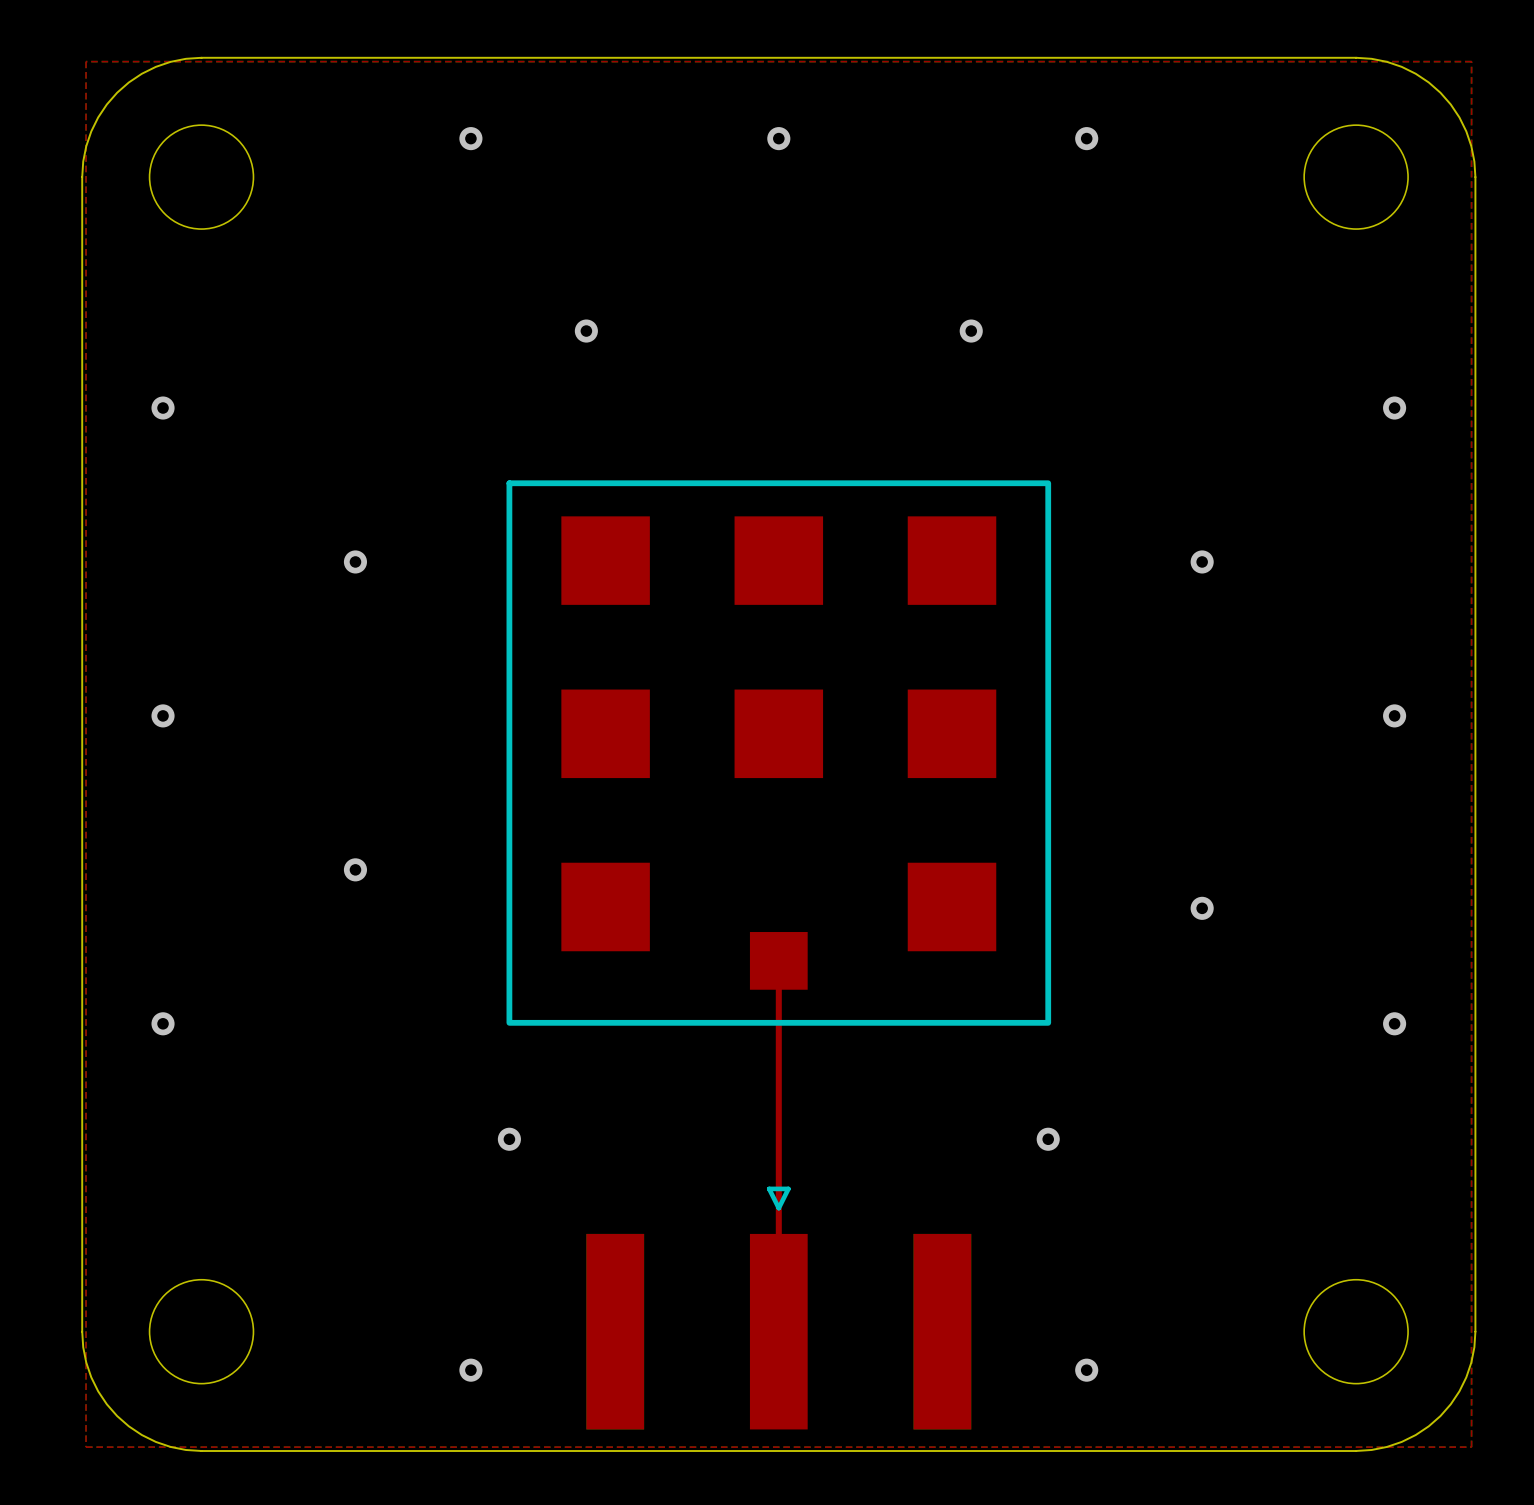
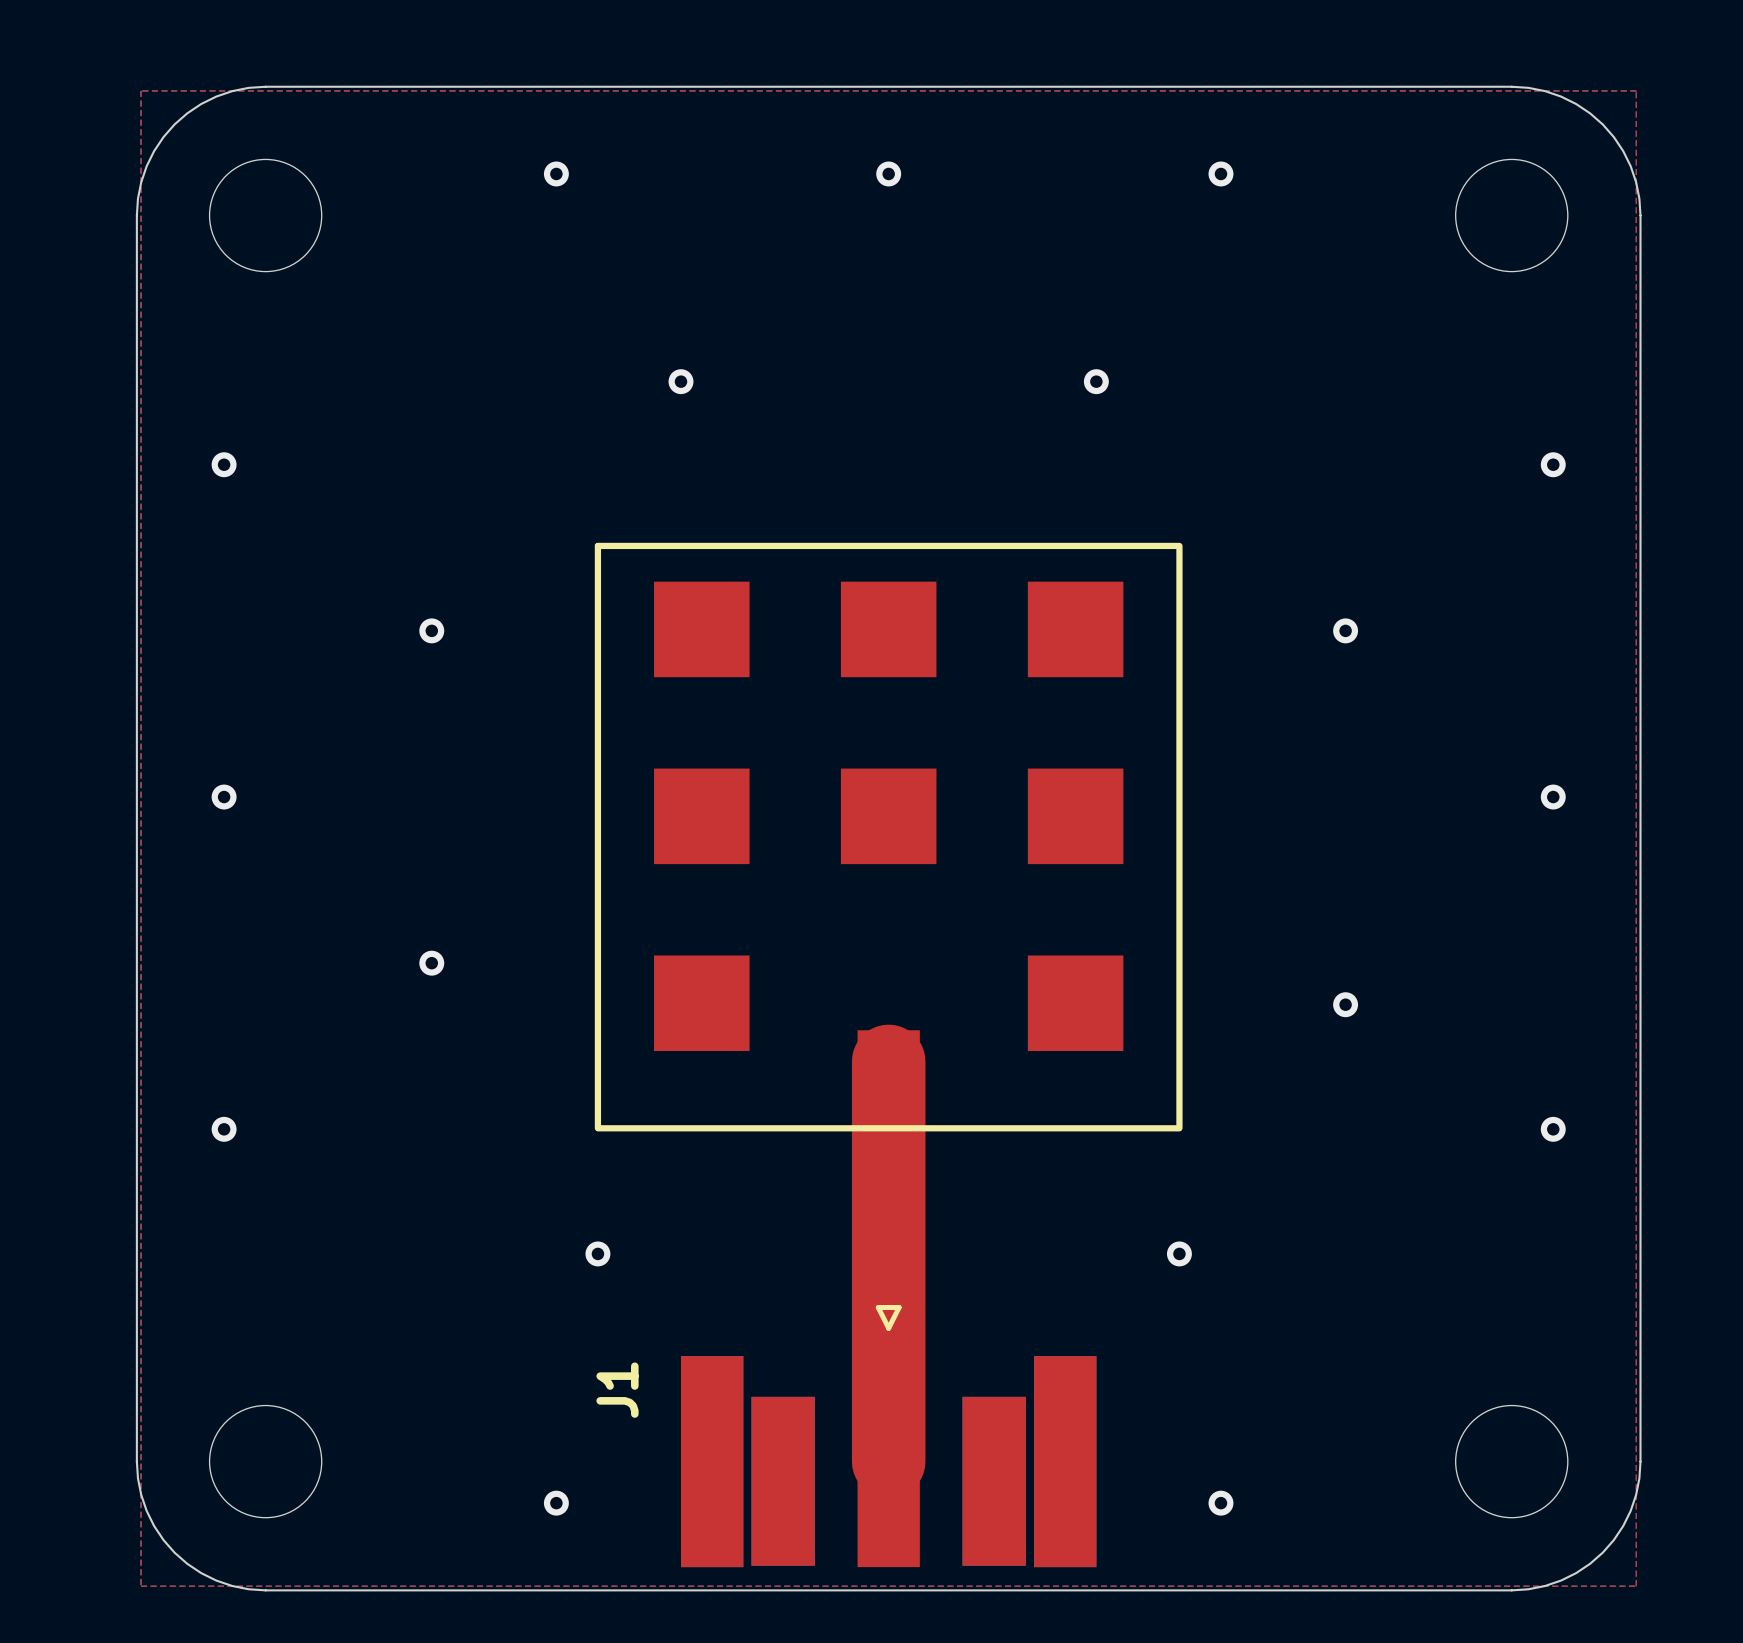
top track width: thin (778, 960) (778, 1331) -> thick (888, 1061) (888, 1461)
J1: none -> (888, 1481)

